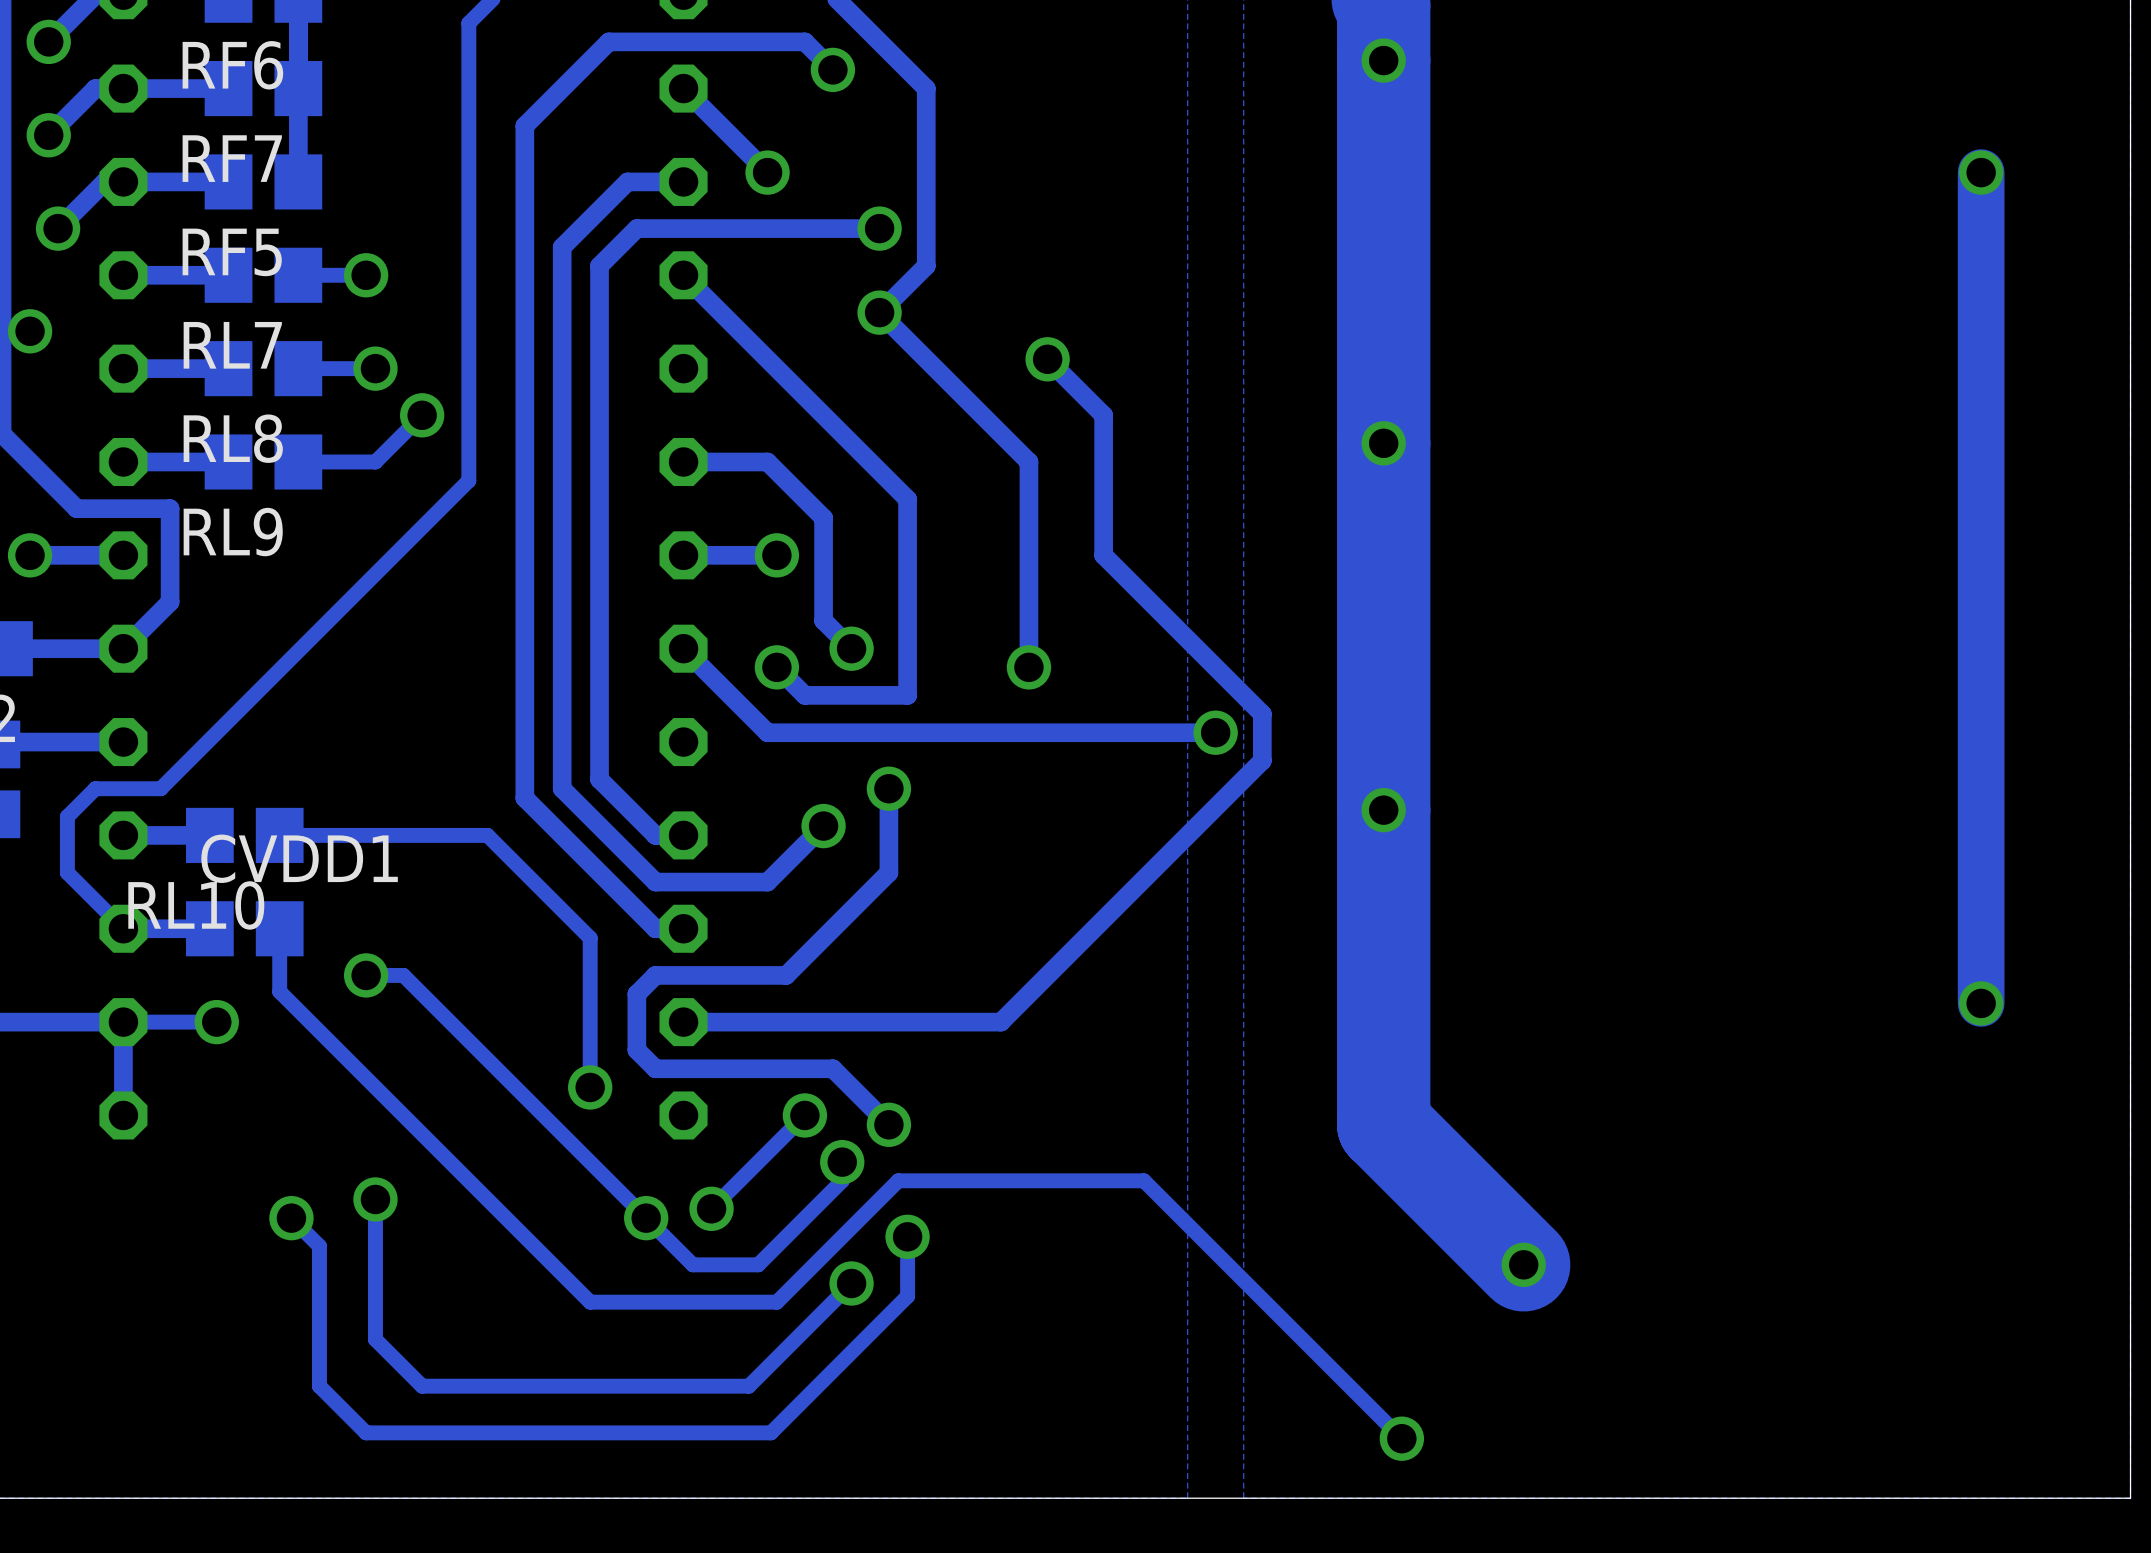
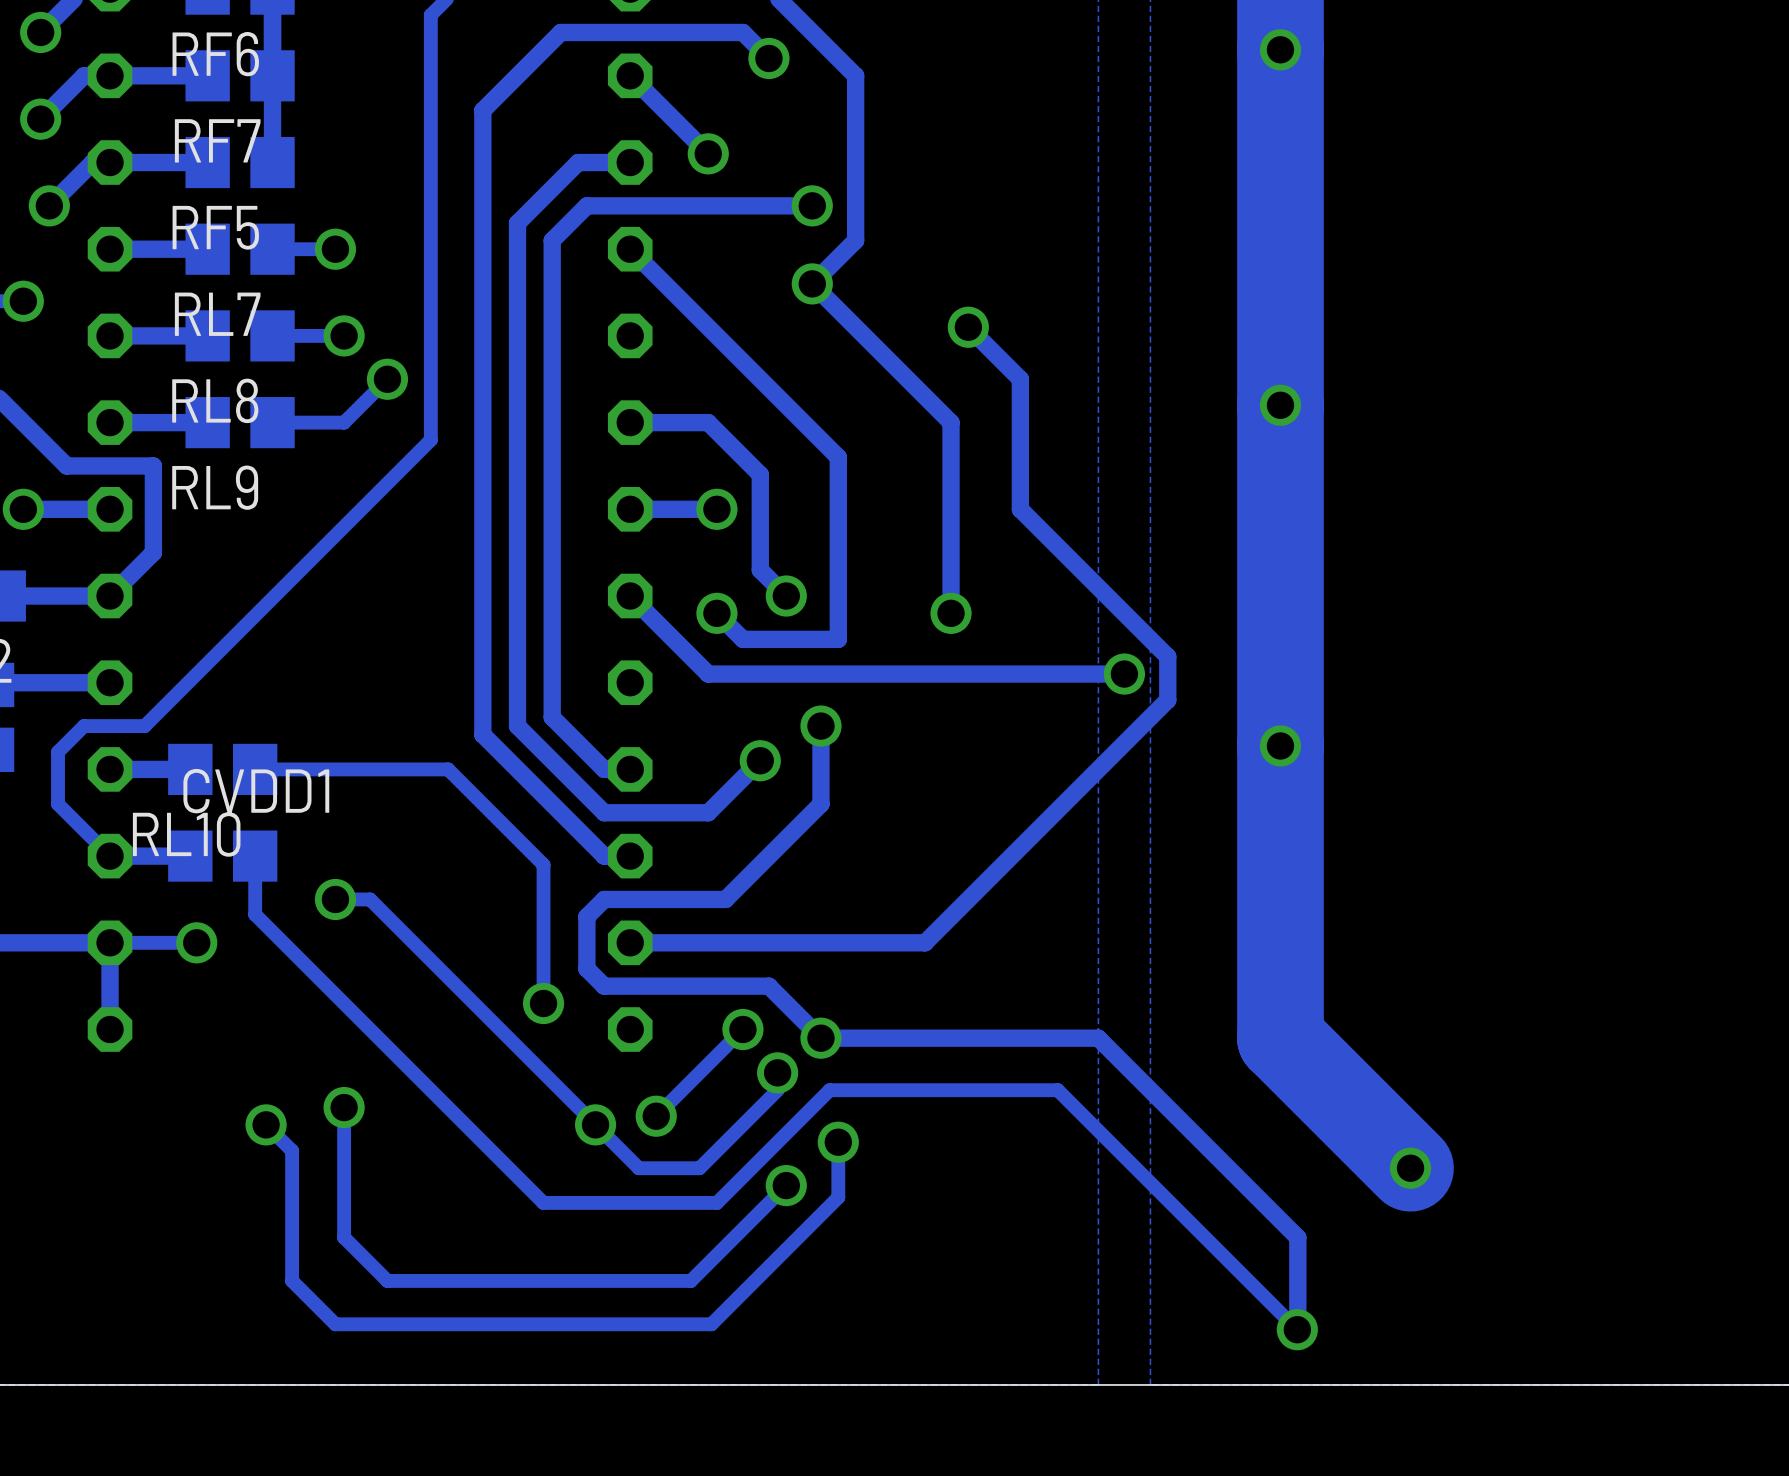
track: none -> (820, 1038) (1098, 1038) (1297, 1237) (1297, 1329)

